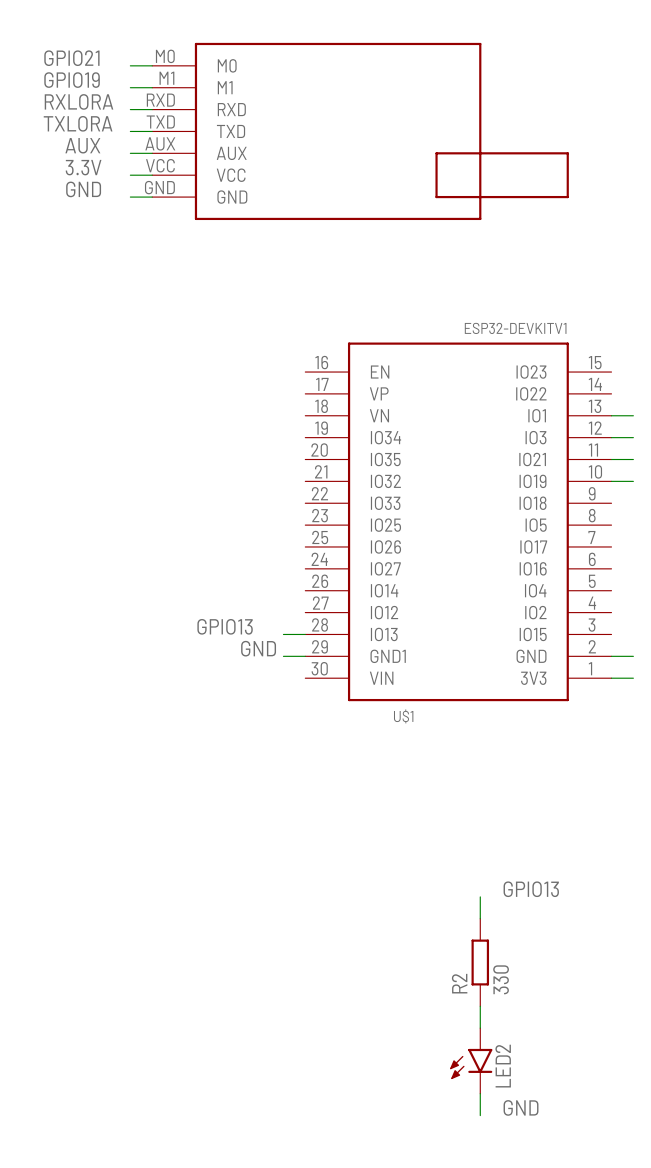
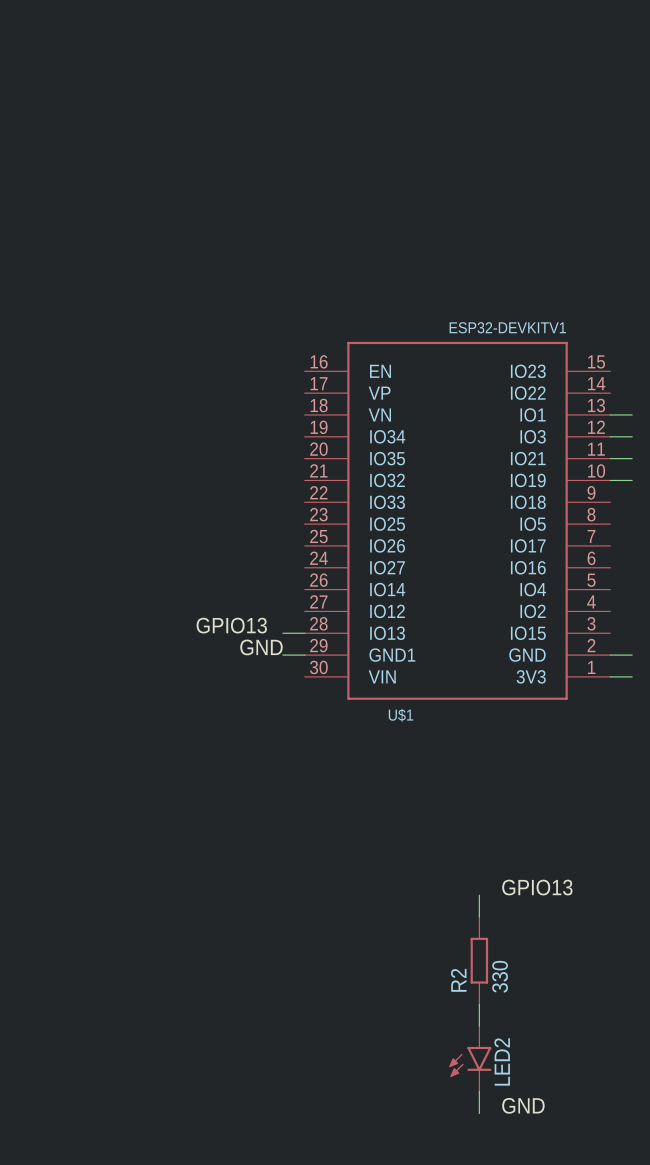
label: GPIO21 (71, 58) -> none
wire: (130, 65) (152, 65) -> none
label: GPIO19 (72, 80) -> none
wire: (130, 87) (152, 87) -> none
label: RXLORA (78, 101) -> none
wire: (130, 109) (152, 109) -> none
label: TXLORA (78, 123) -> none
wire: (130, 131) (152, 131) -> none
part: (360, 131) -> none
label: AUX (82, 145) -> none
wire: (130, 153) (152, 153) -> none
label: 3.3V (83, 167) -> none
wire: (130, 175) (152, 175) -> none
label: GND (83, 189) -> none
wire: (130, 197) (152, 197) -> none

